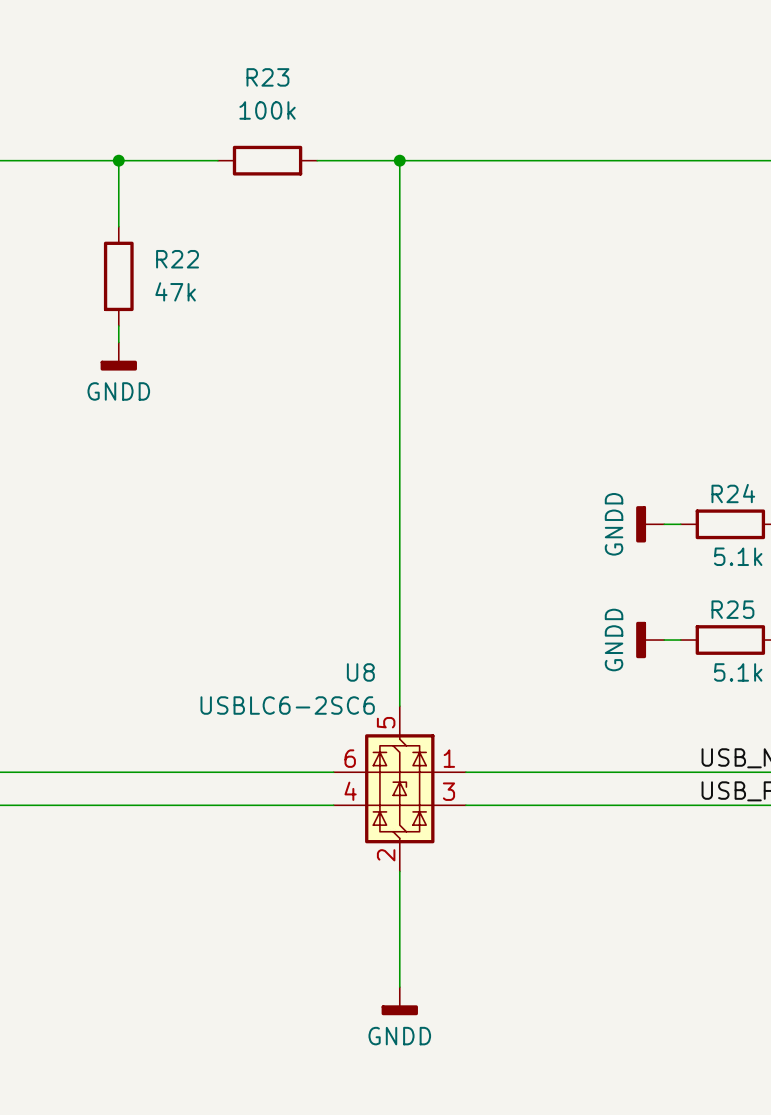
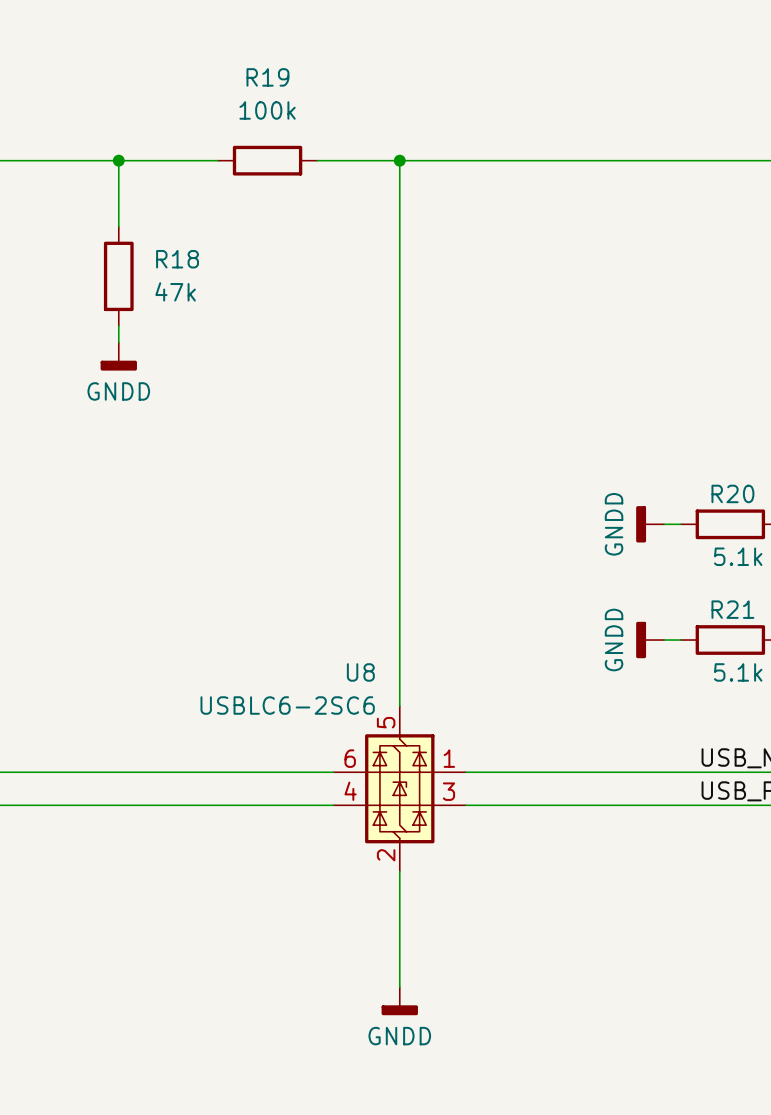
R23 name: R23 (267, 77) -> R19 (267, 77)
R22 name: R22 (177, 259) -> R18 (177, 259)
R24 name: R24 (733, 493) -> R20 (732, 493)
R25 name: R25 (732, 609) -> R21 (732, 609)

